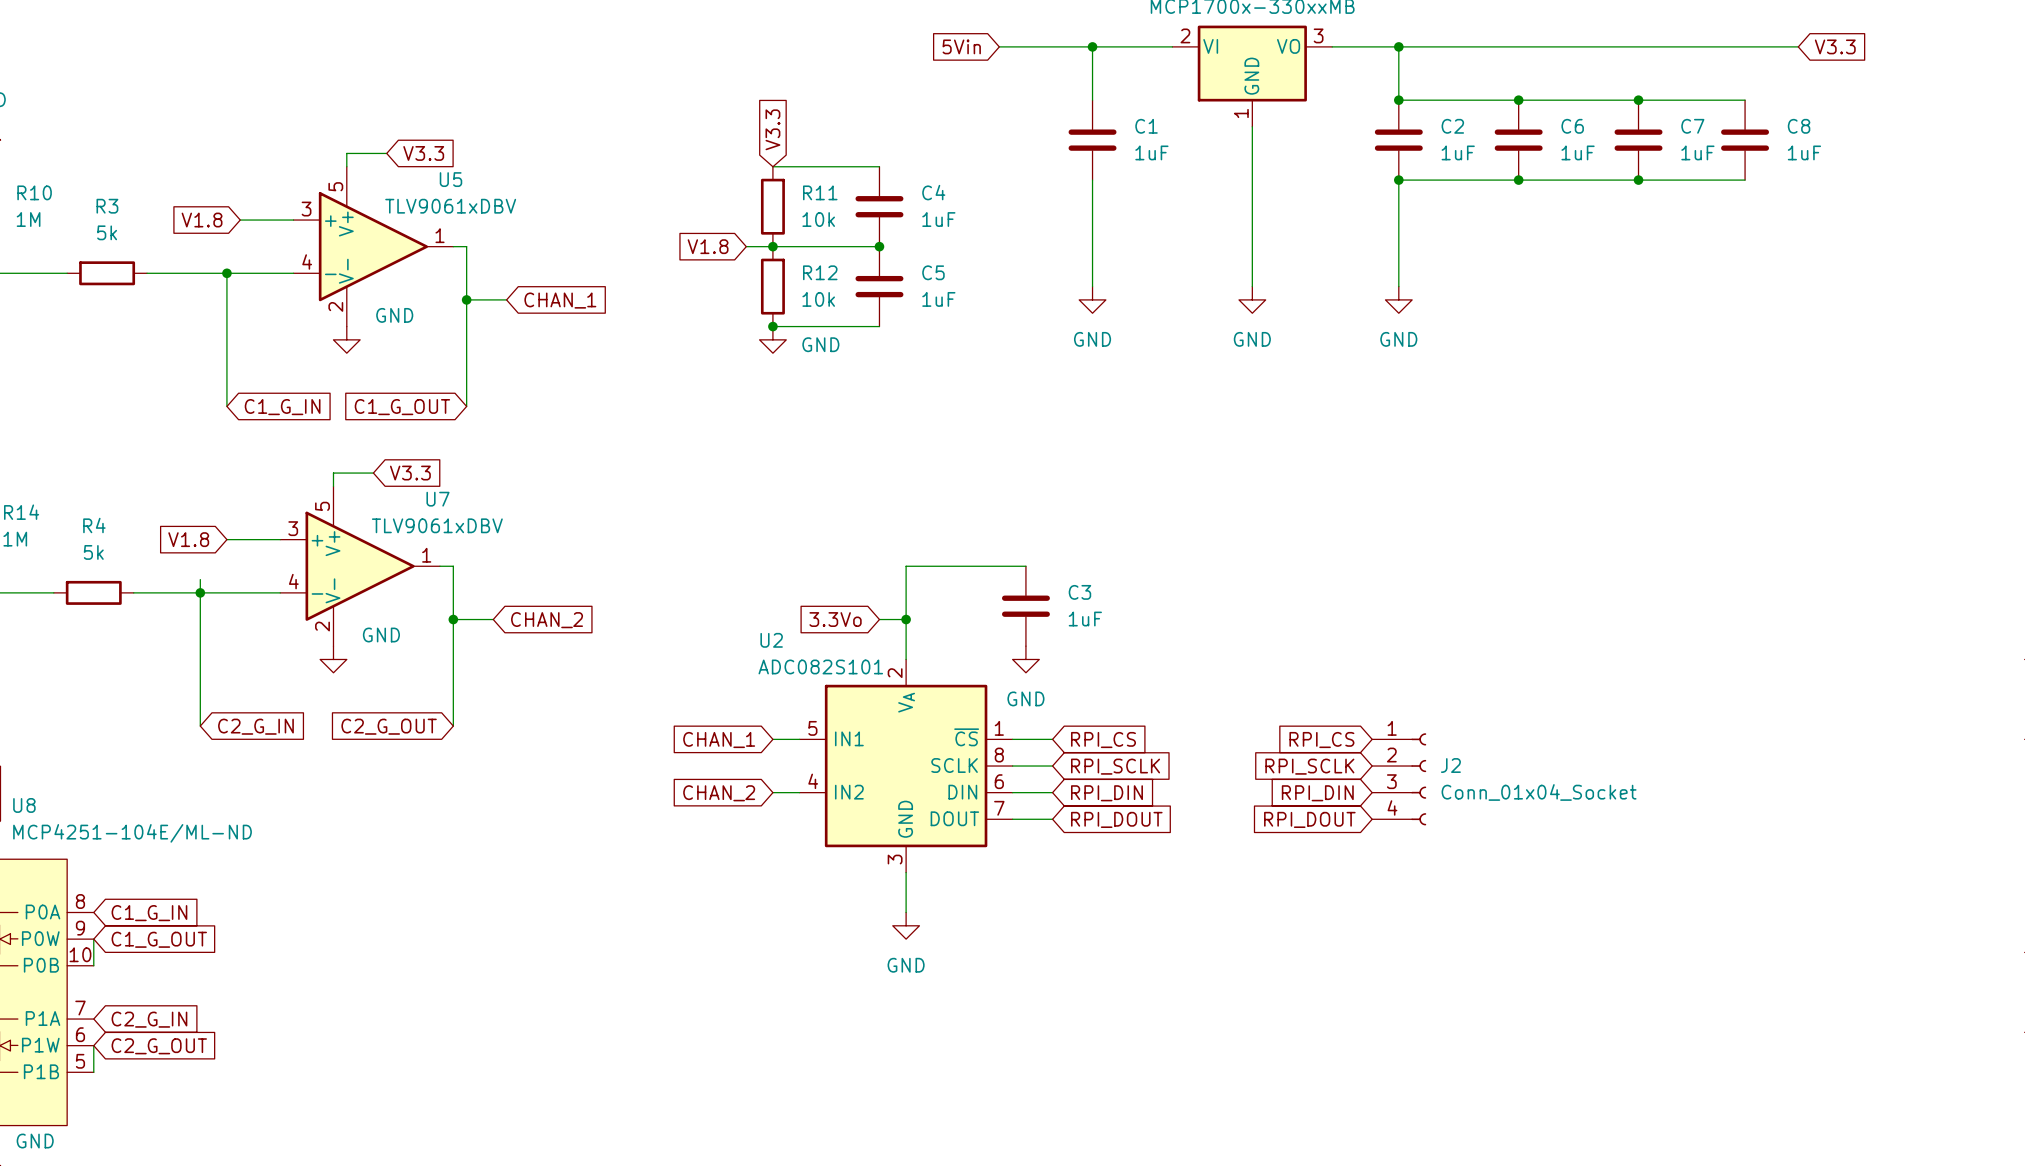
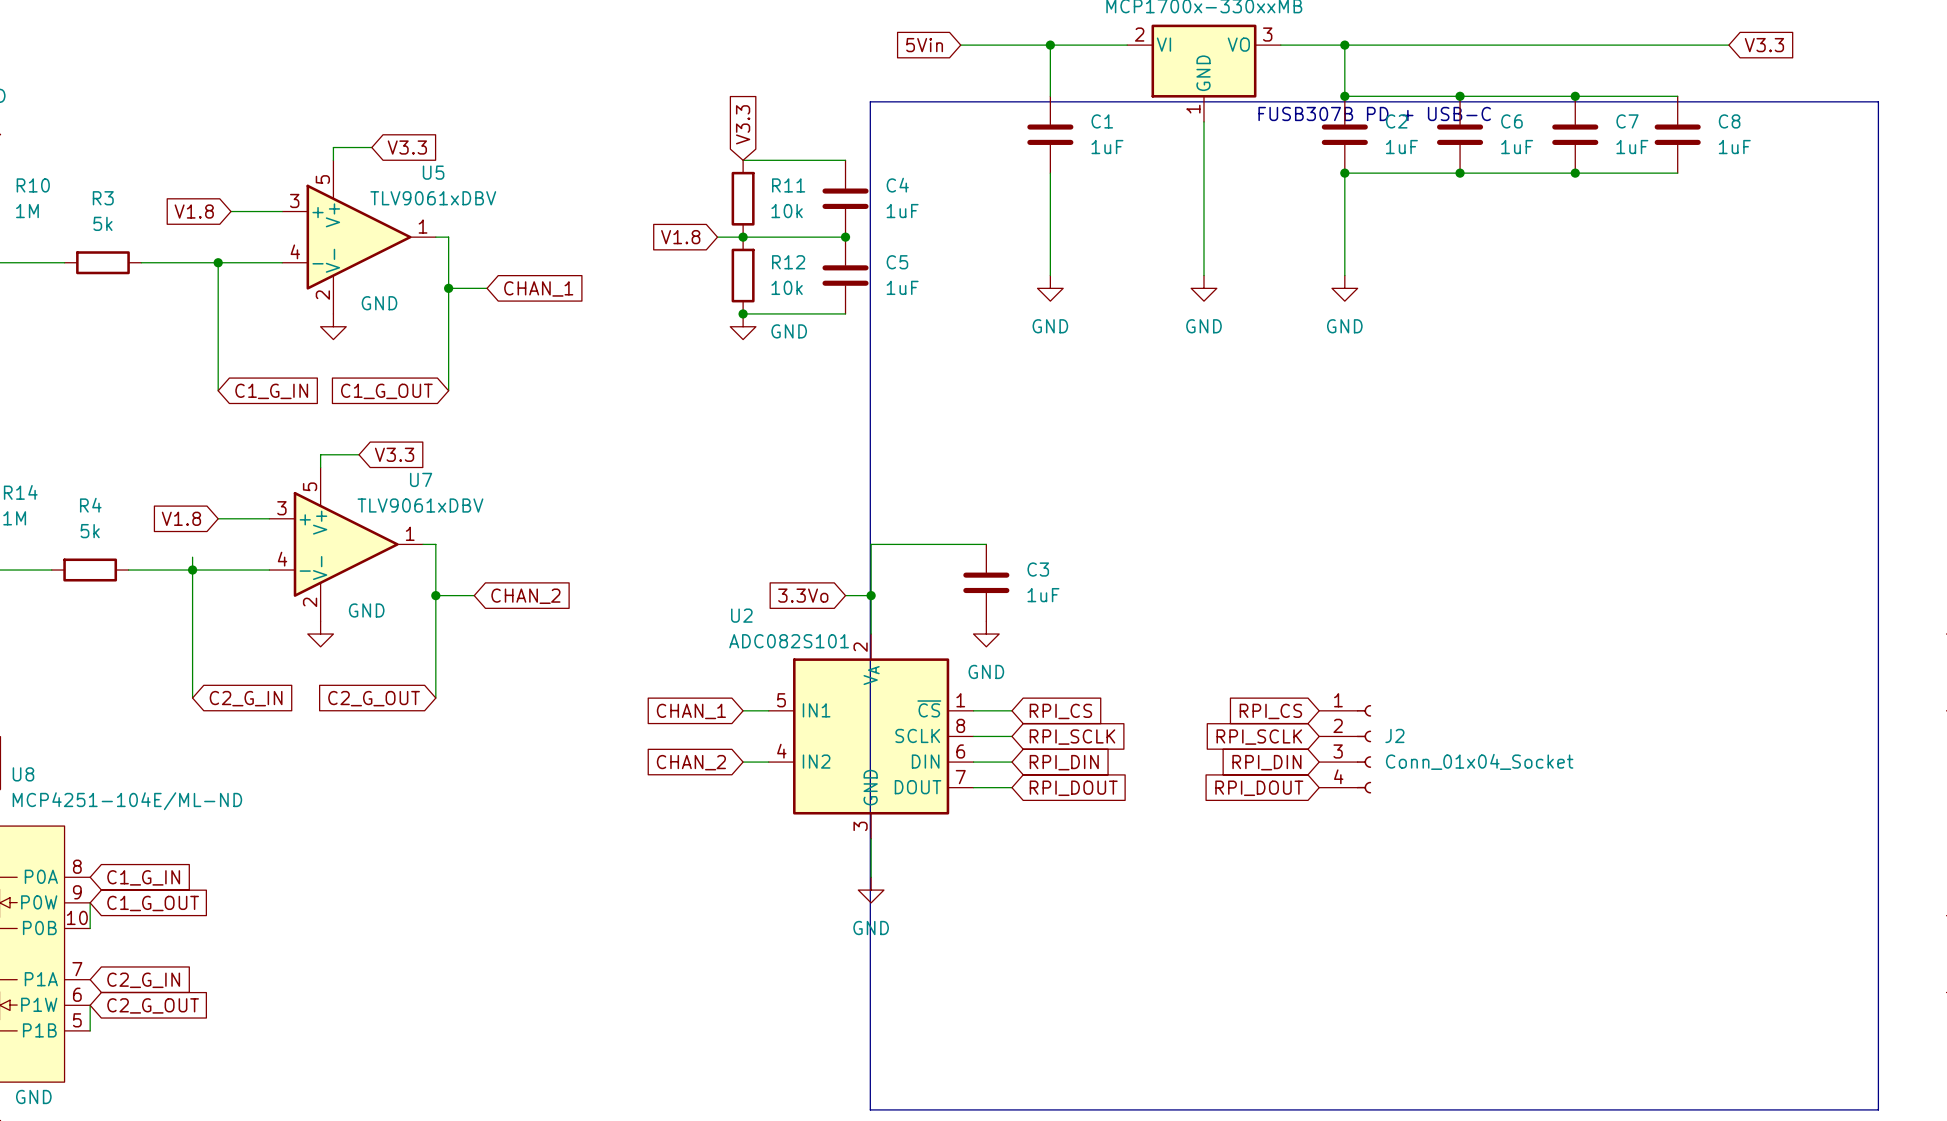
line: none -> (870, 101) (1878, 101) (1878, 1109) (870, 1109) (870, 101)
text: none -> FUSB307B PD + USB-C (1374, 113)

